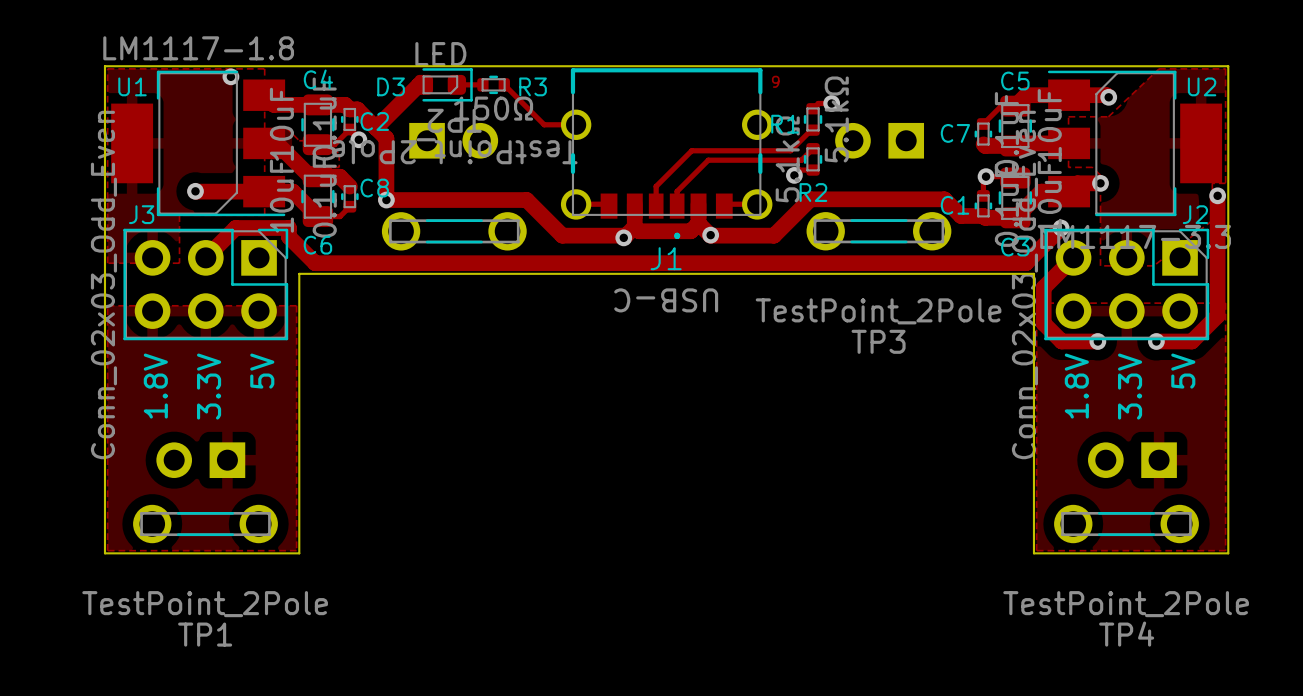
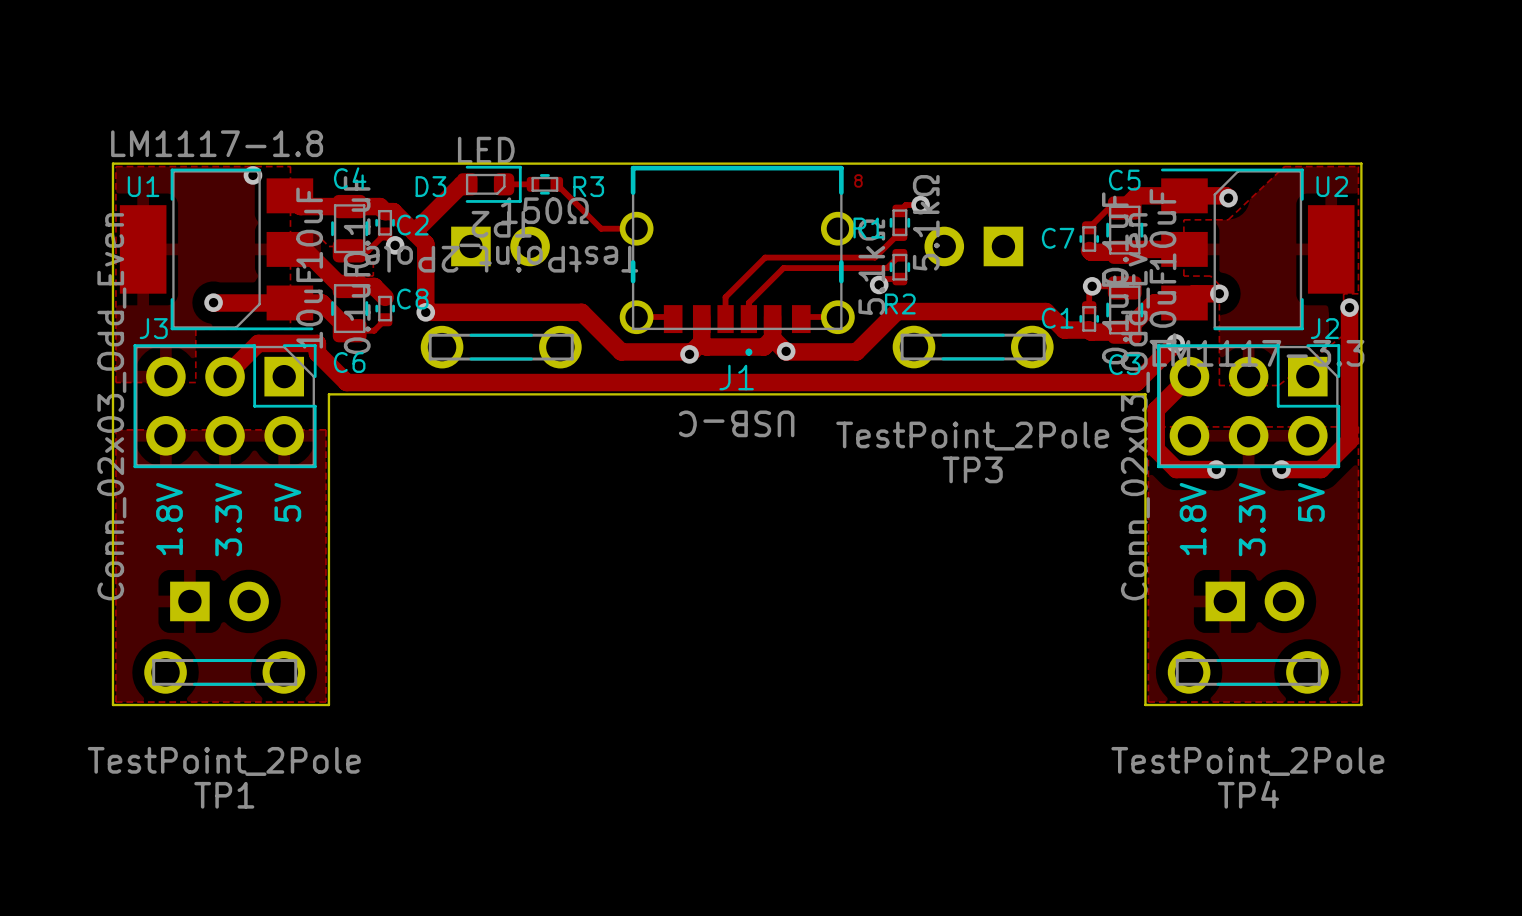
text: 9 (775, 81) -> 8 (858, 180)
part rotation: 0° (200, 460) -> 180° (219, 601)
part rotation: 0° (1132, 460) -> 180° (1254, 601)

